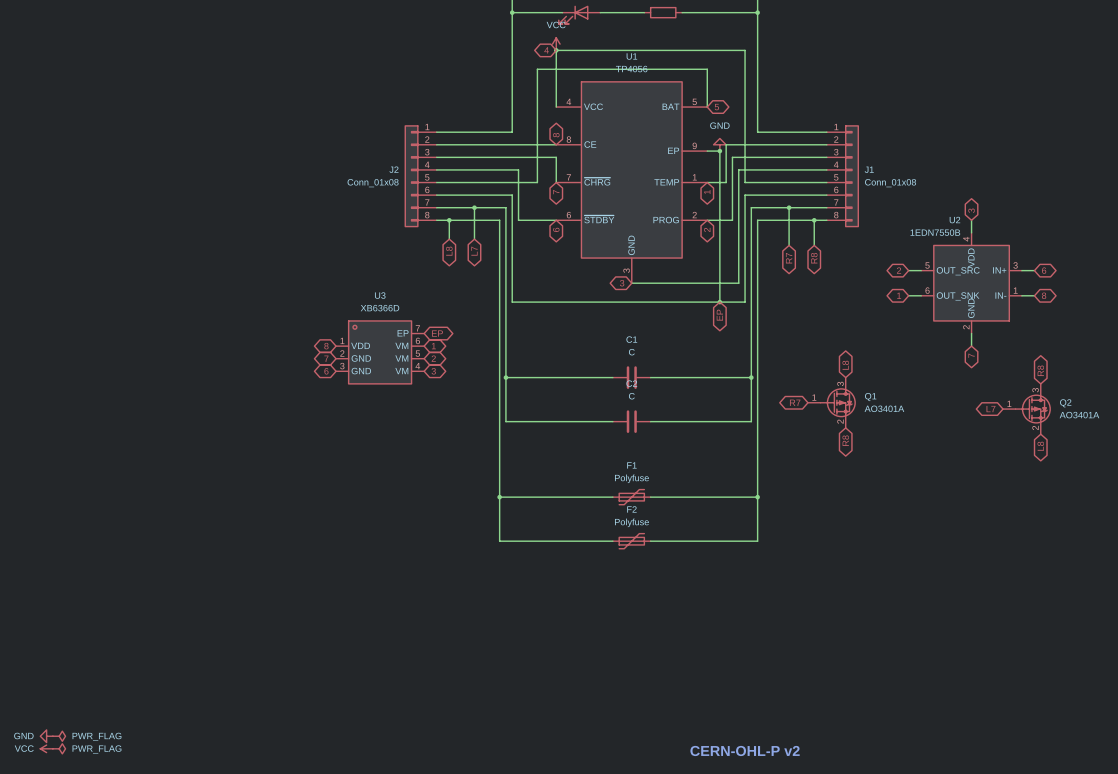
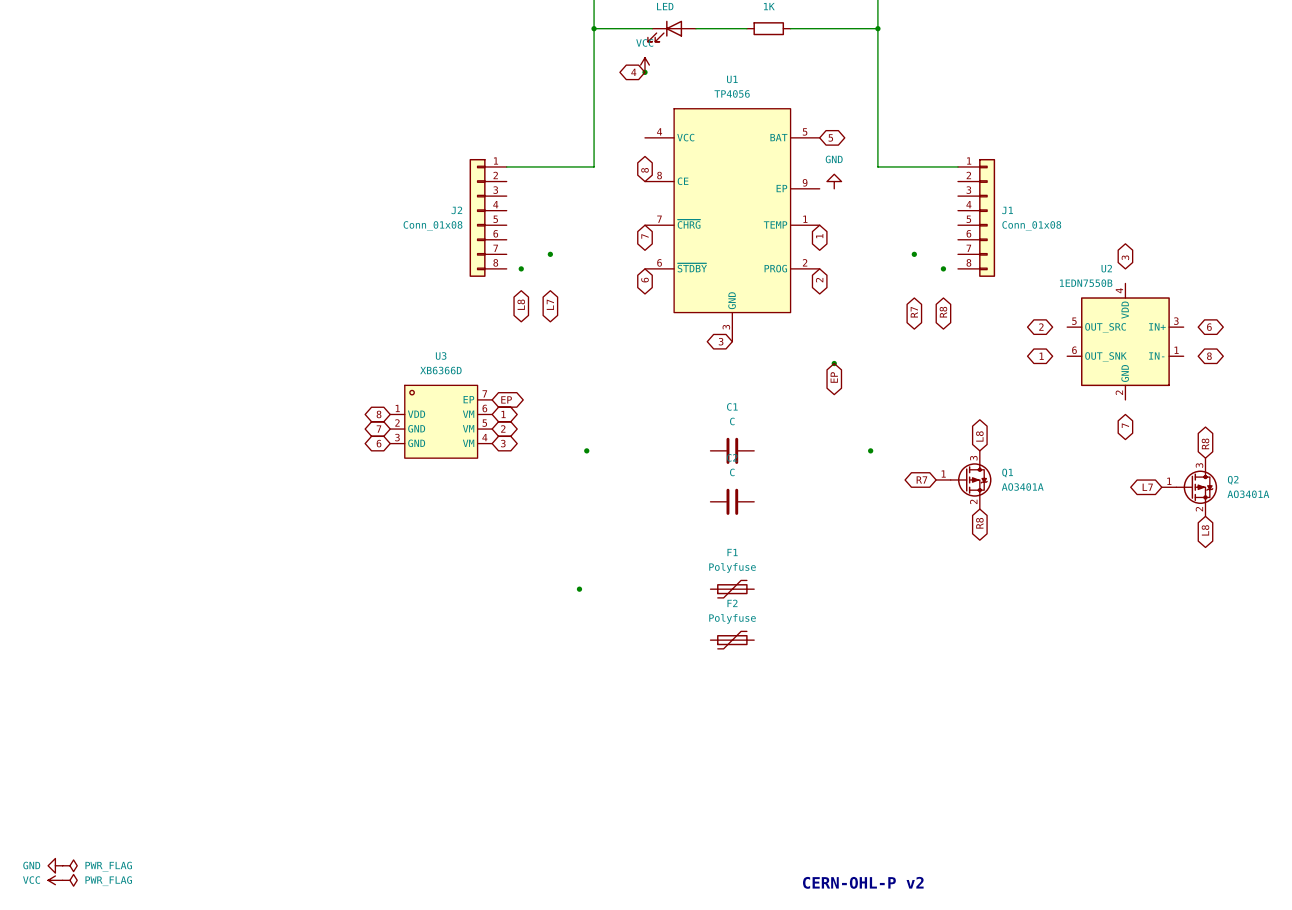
wire: (556, 107) (556, 50) (745, 50) (745, 182) (826, 182) -> none
wire: (707, 107) (707, 69) (537, 69) (537, 182) (436, 182) -> none
wire: (436, 144) (556, 144) -> none
wire: (826, 144) (726, 144) (726, 182) (707, 182) -> none
wire: (707, 151) (719, 151) (719, 302) -> none
junction: (719, 151) -> none
wire: (436, 157) (556, 157) (556, 182) -> none
wire: (826, 157) (732, 157) (732, 220) (707, 220) -> none
wire: (436, 169) (518, 169) (518, 220) (556, 220) -> none
wire: (826, 169) (738, 169) (738, 283) (631, 283) -> none
wire: (436, 195) (512, 195) (512, 302) (745, 302) (745, 195) (826, 195) -> none
wire: (436, 207) (505, 207) (505, 421) (612, 421) -> none
wire: (474, 207) (474, 239) -> none
wire: (789, 207) (789, 245) -> none
wire: (826, 207) (751, 207) (751, 421) (650, 421) -> none
wire: (436, 220) (499, 220) (499, 541) (612, 541) -> none
wire: (449, 220) (449, 239) -> none
wire: (814, 220) (814, 245) -> none
wire: (826, 220) (757, 220) (757, 541) (650, 541) -> none
wire: (971, 220) (971, 232) -> none
wire: (908, 270) (921, 270) -> none
wire: (1021, 270) (1034, 270) -> none
wire: (908, 295) (921, 295) -> none
wire: (1021, 295) (1034, 295) -> none
wire: (971, 333) (971, 346) -> none
wire: (505, 377) (612, 377) -> none
wire: (650, 377) (751, 377) -> none
wire: (499, 497) (612, 497) -> none
wire: (650, 497) (757, 497) -> none
junction: (757, 497) -> none

